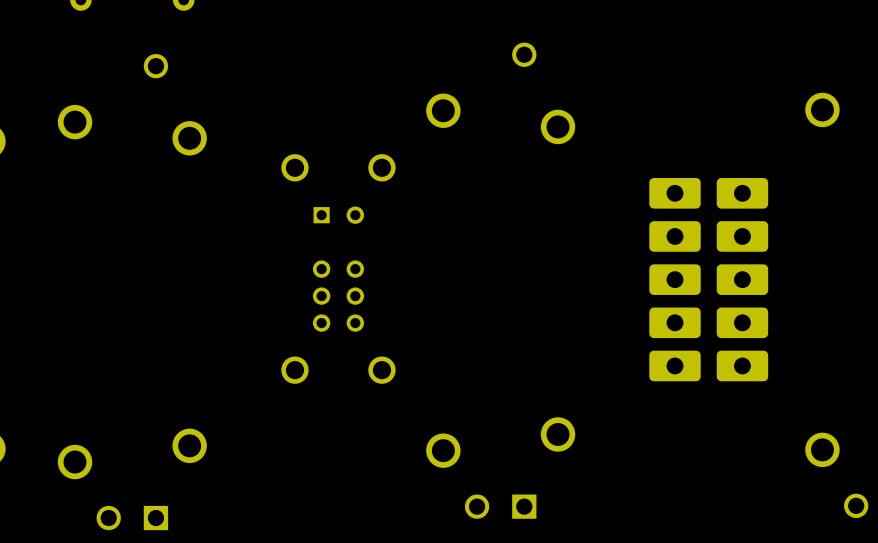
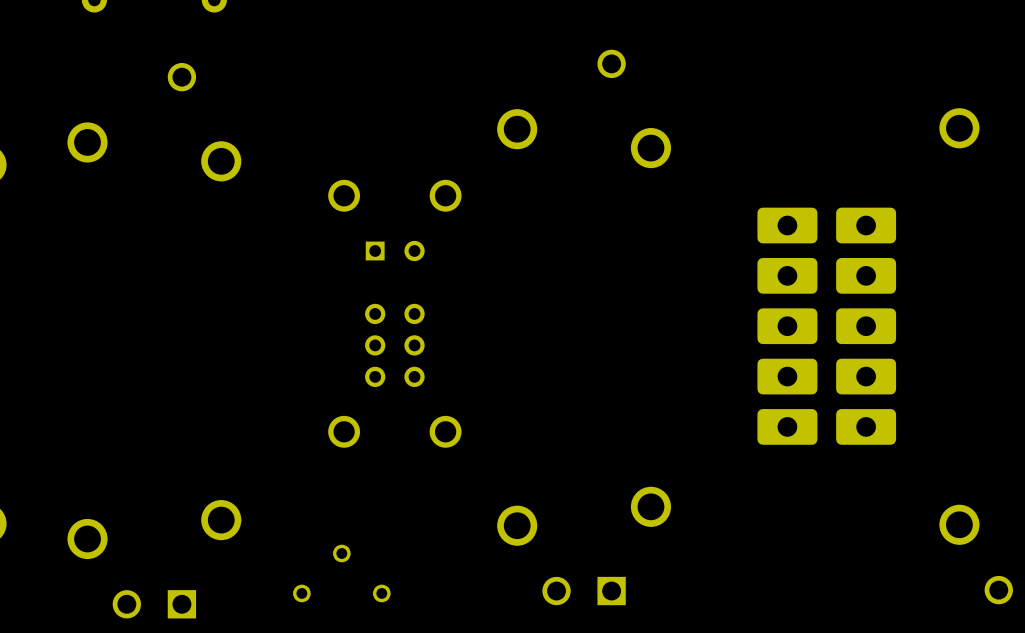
part: none -> (341, 573)

